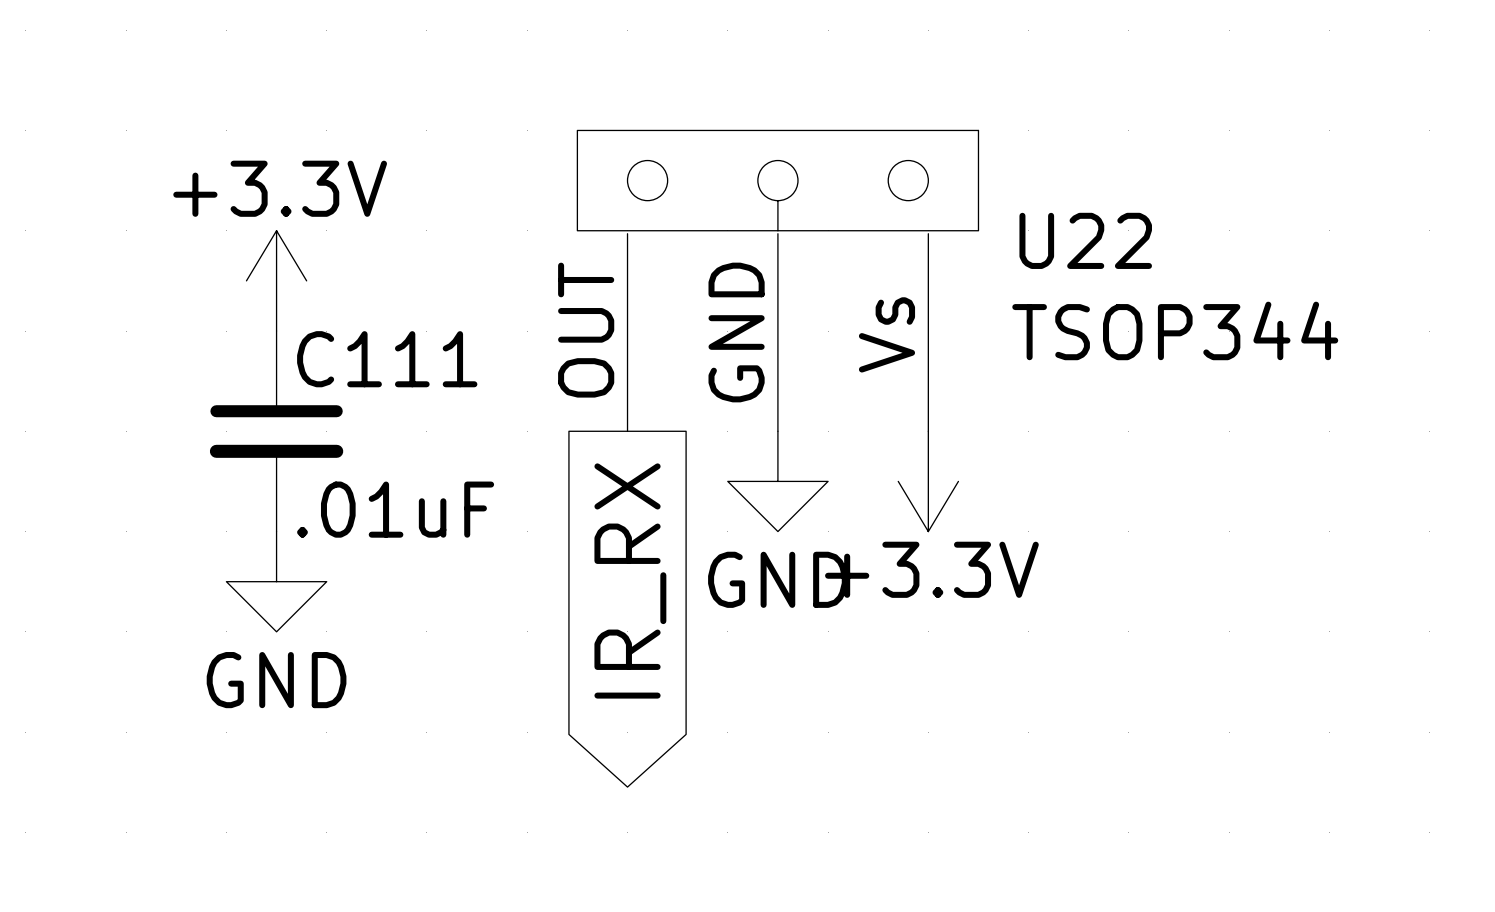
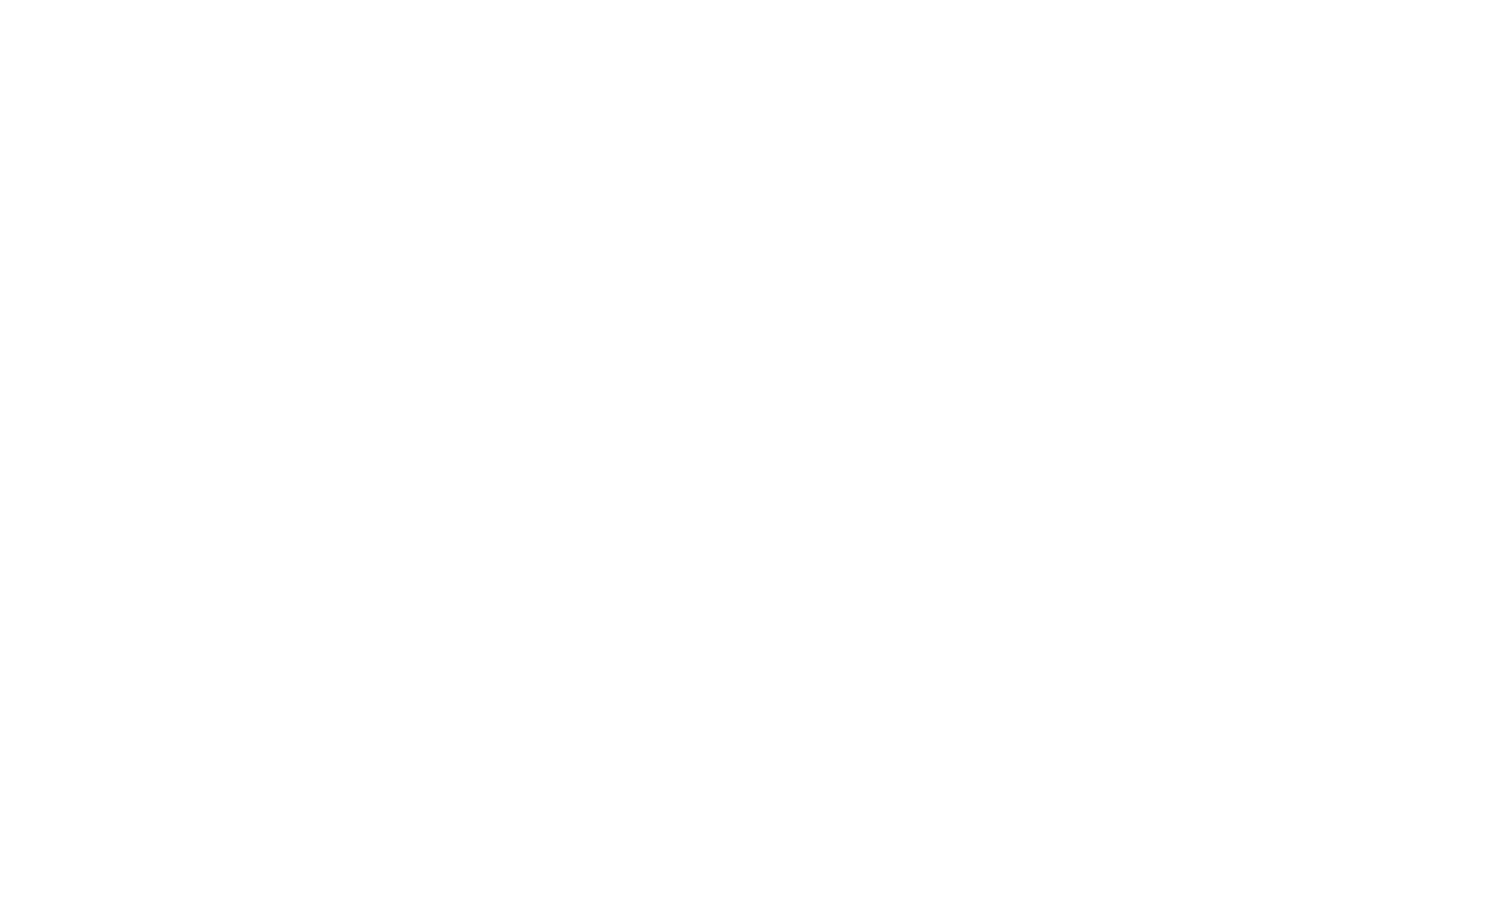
power symbol: +3.3V (276, 280) -> none
U22: TSOP344 (777, 280) -> none
C111: .01uF (276, 431) -> none
power symbol: GND (777, 481) -> none
power symbol: +3.3V (928, 481) -> none
global label: IR_RX (630, 580) -> none
power symbol: GND (276, 581) -> none

